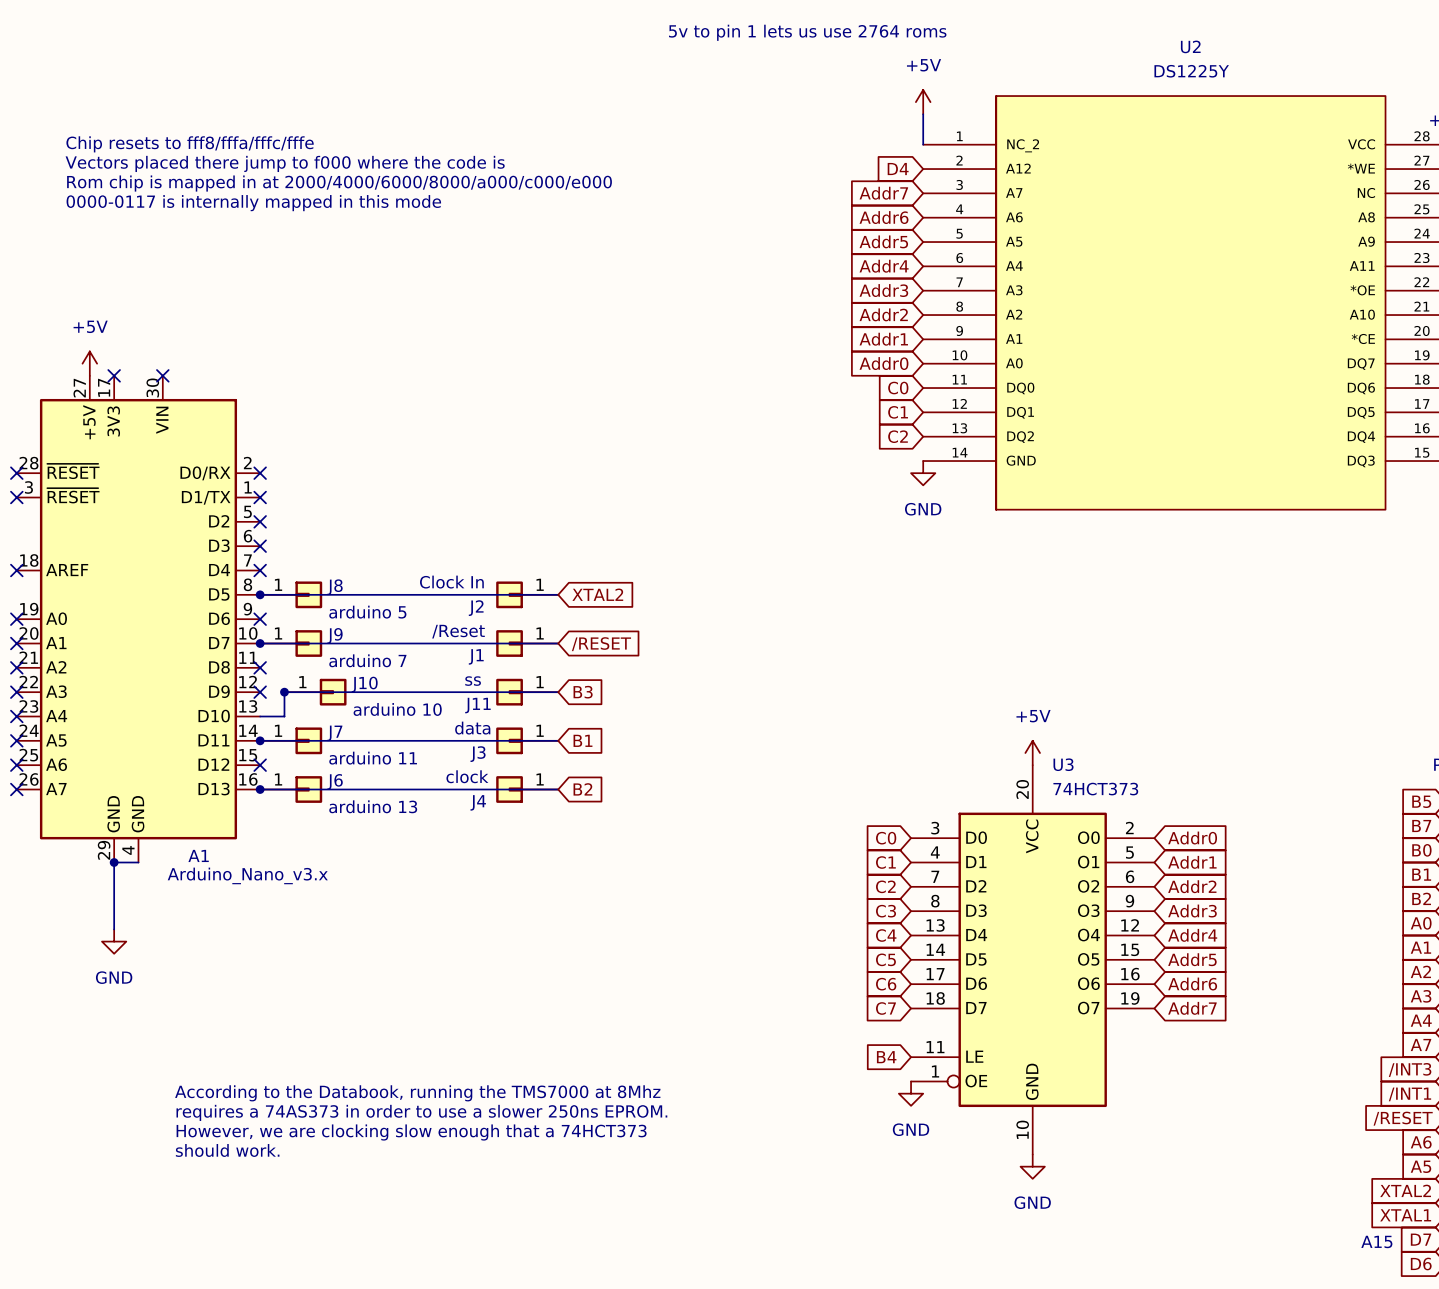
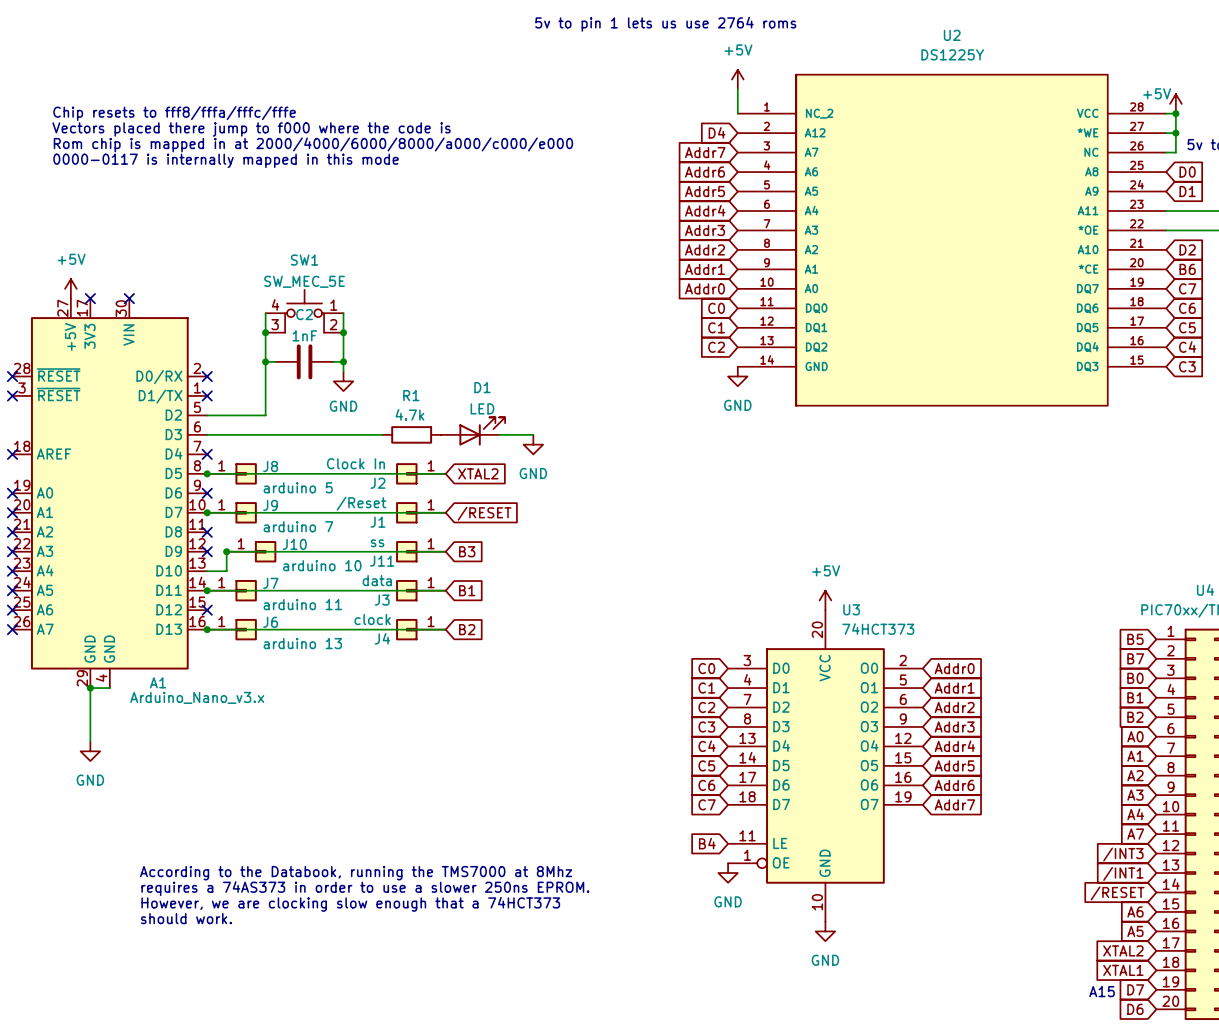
SW1: none -> SW_MEC_5E (304, 311)
wire: none -> (265, 313) (265, 415) (207, 415)
wire: none -> (343, 313) (343, 371)
junction: none -> (265, 332)
junction: none -> (343, 332)
wire: none -> (265, 361) (275, 361)
junction: none -> (265, 361)
C2: none -> 1nF (304, 361)
wire: none -> (333, 361) (343, 361)
junction: none -> (343, 361)
power symbol: none -> GND (343, 381)
no-connect mark: (260, 521) -> none
D1: none -> LED (472, 431)
wire: none -> (207, 434) (382, 434)
no-connect mark: (260, 546) -> none
R1: none -> 4.7k (411, 434)
wire: none -> (499, 434) (533, 434)
power symbol: none -> GND (533, 444)

